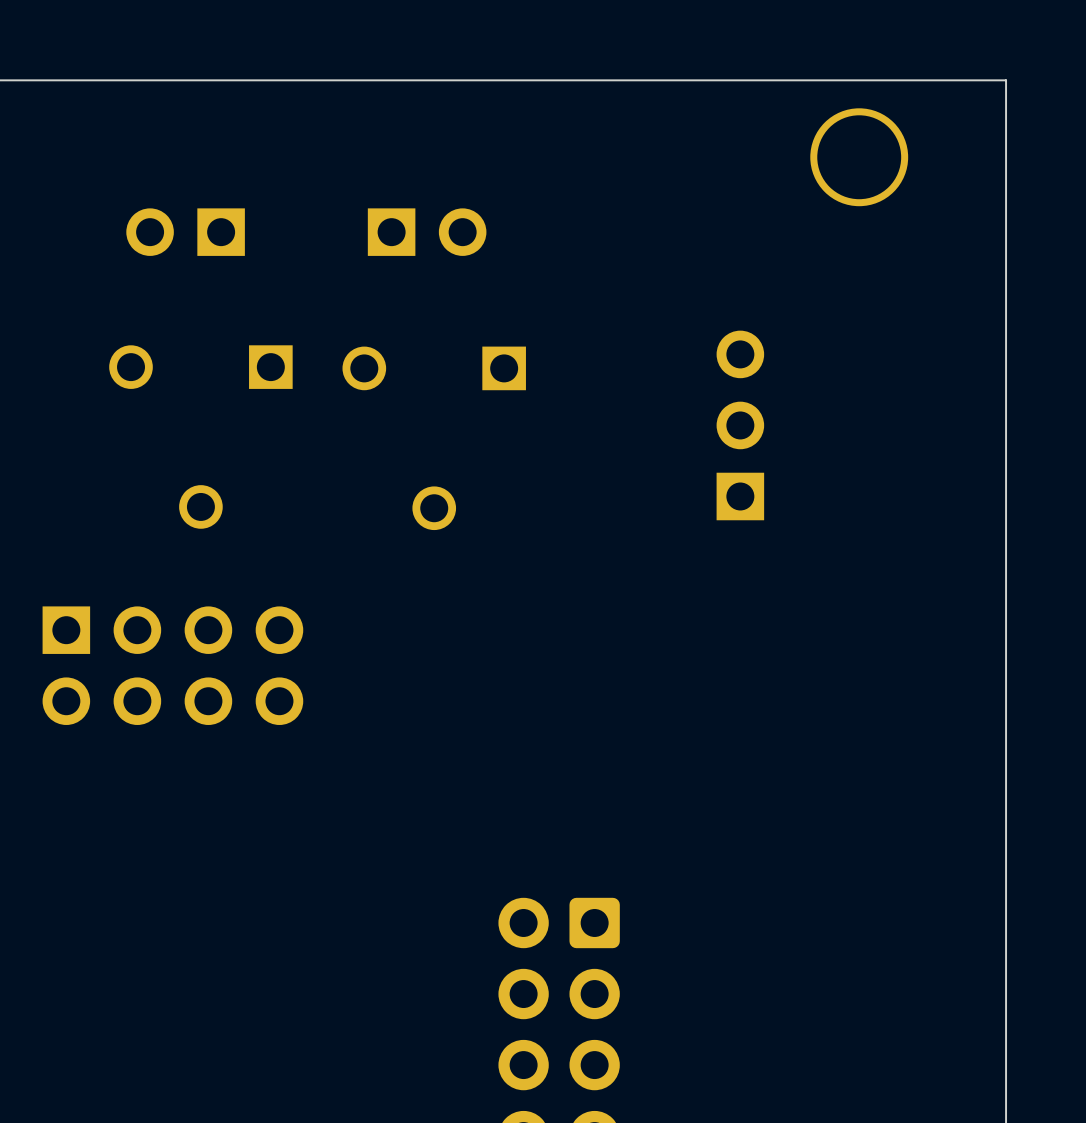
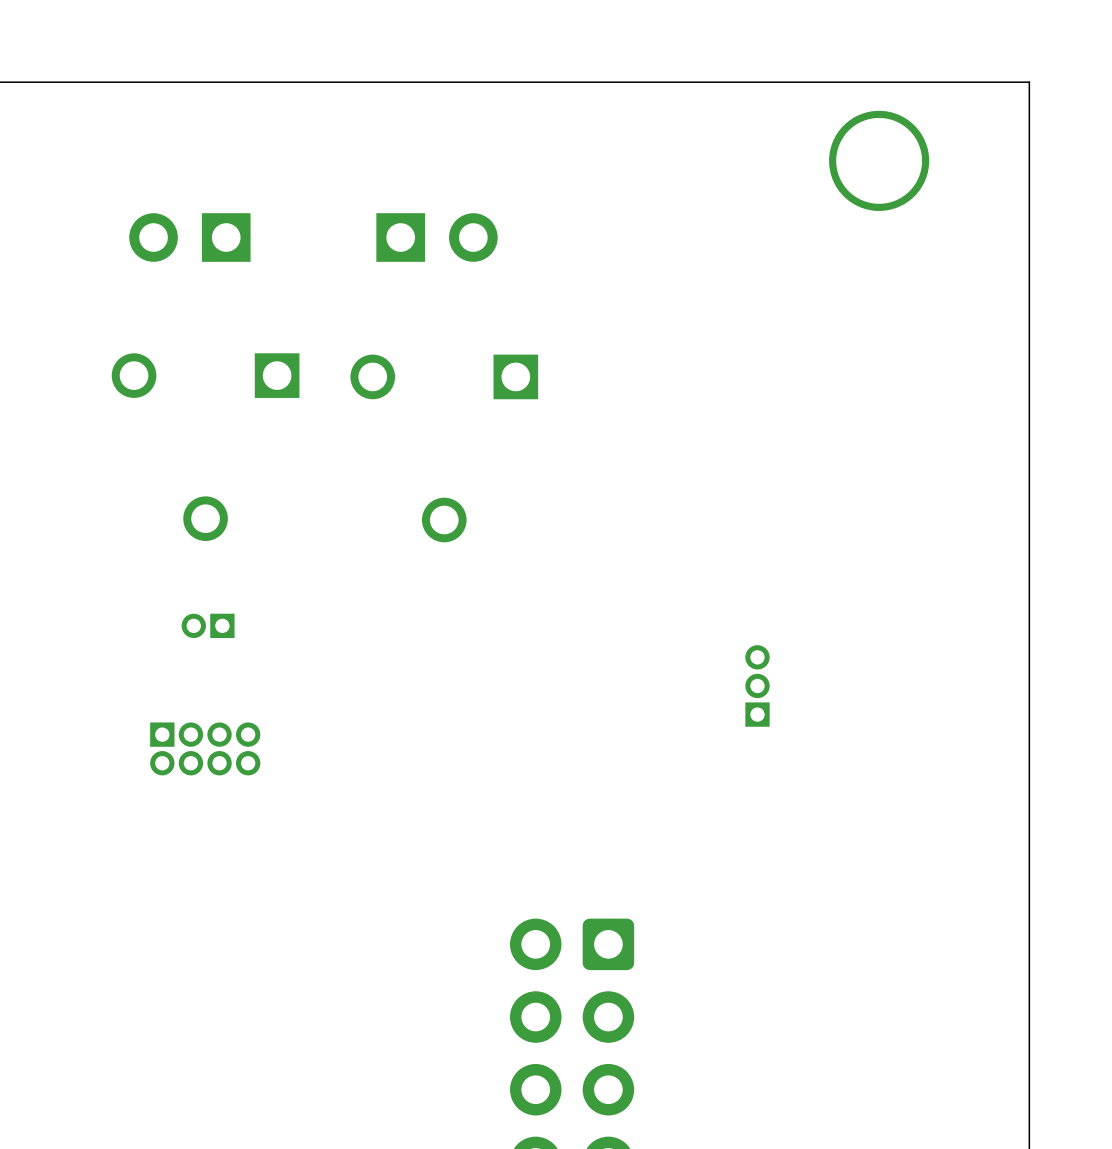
part: (740, 425) -> none
part: none -> (208, 625)
part: (172, 665) -> none
part: none -> (757, 685)
part: none -> (205, 748)

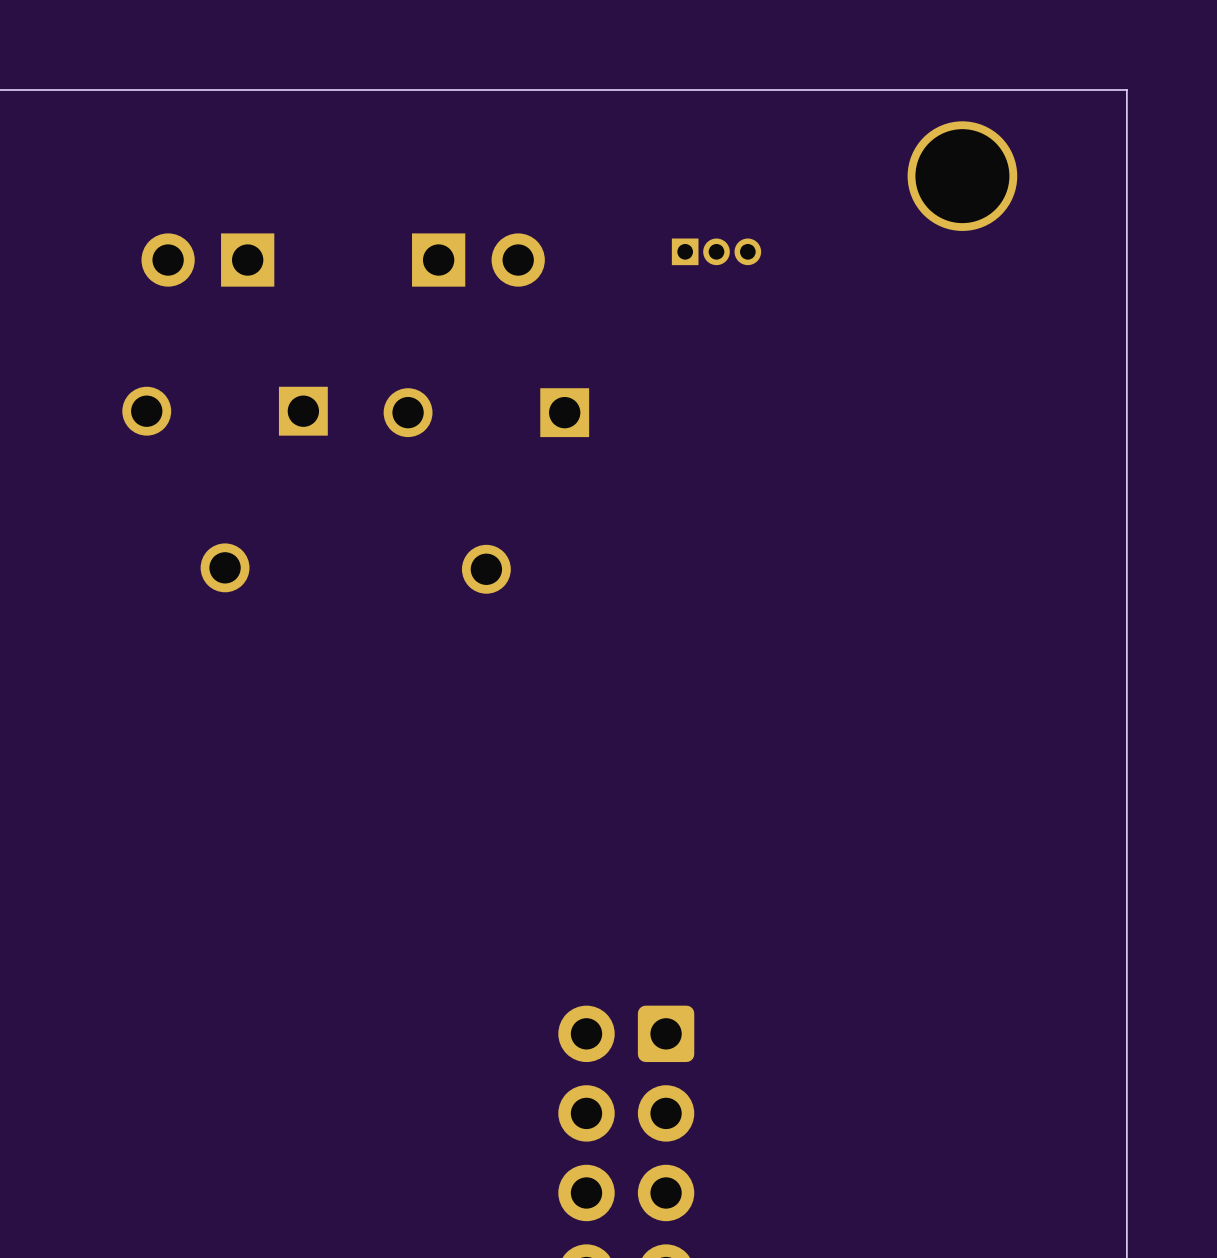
part: (208, 625) -> none
part rotation: 0° (757, 685) -> 90° clockwise (716, 251)
part position: (757, 685) -> (716, 251)
part: (205, 748) -> none

